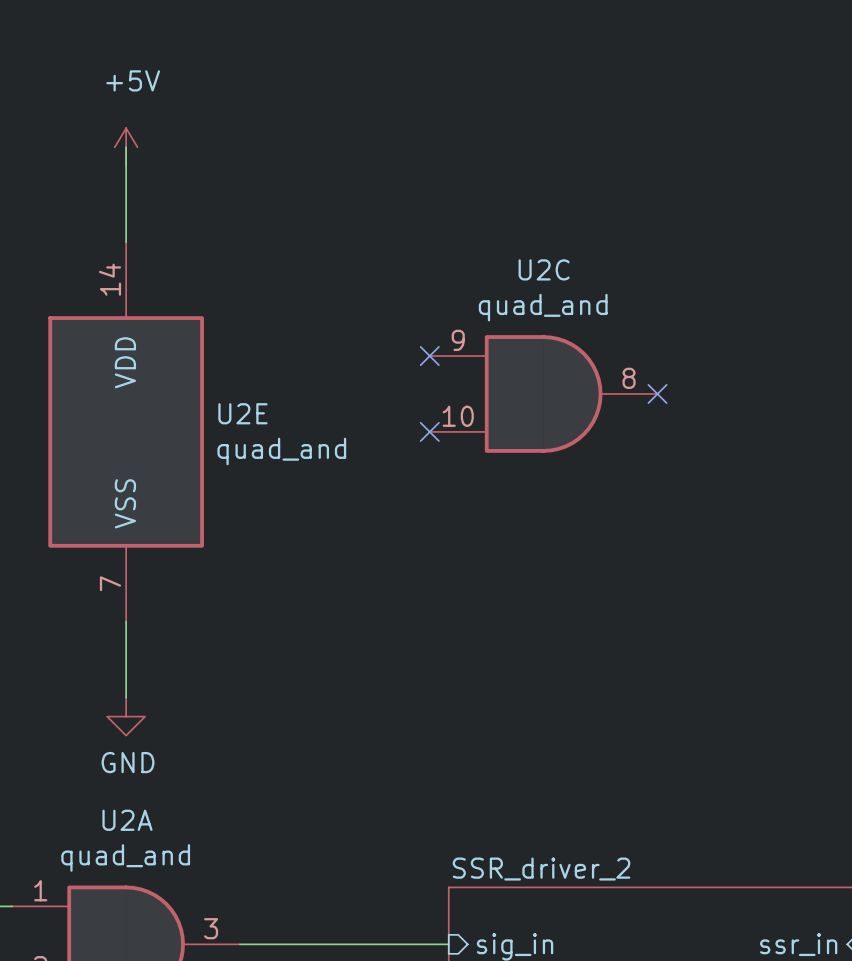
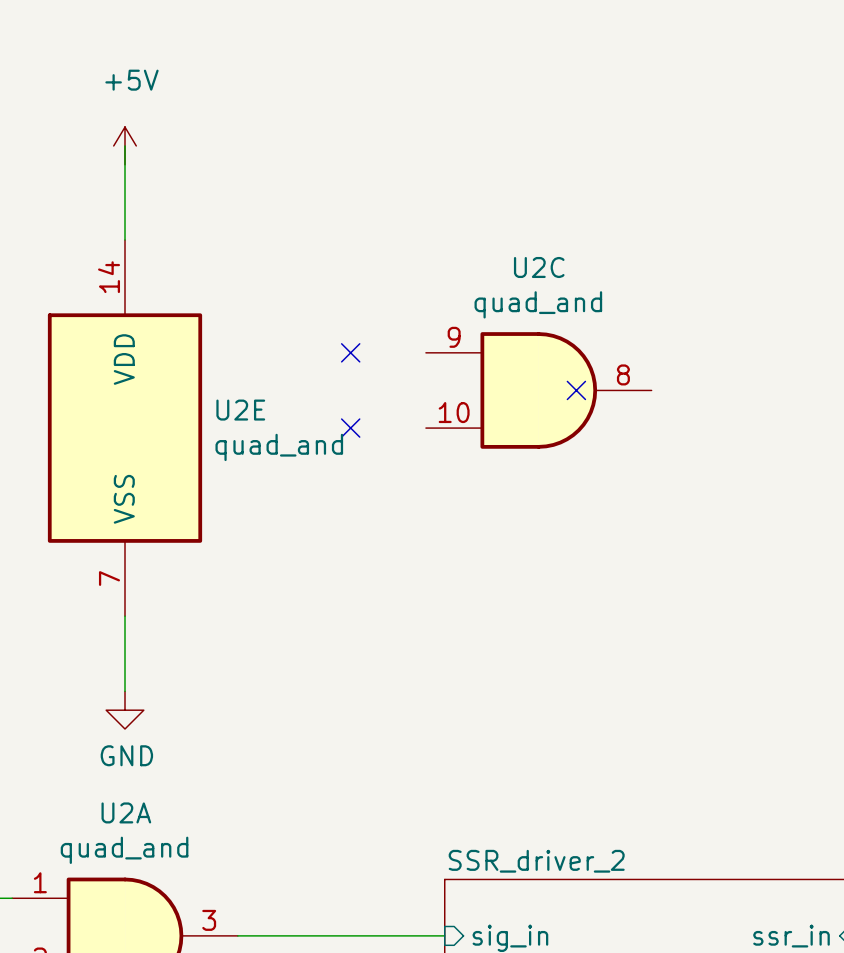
no-connect mark: none -> (350, 352)
no-connect mark: (429, 356) -> none
no-connect mark position: (657, 393) -> (576, 390)
no-connect mark: none -> (350, 428)
no-connect mark: (429, 431) -> none

